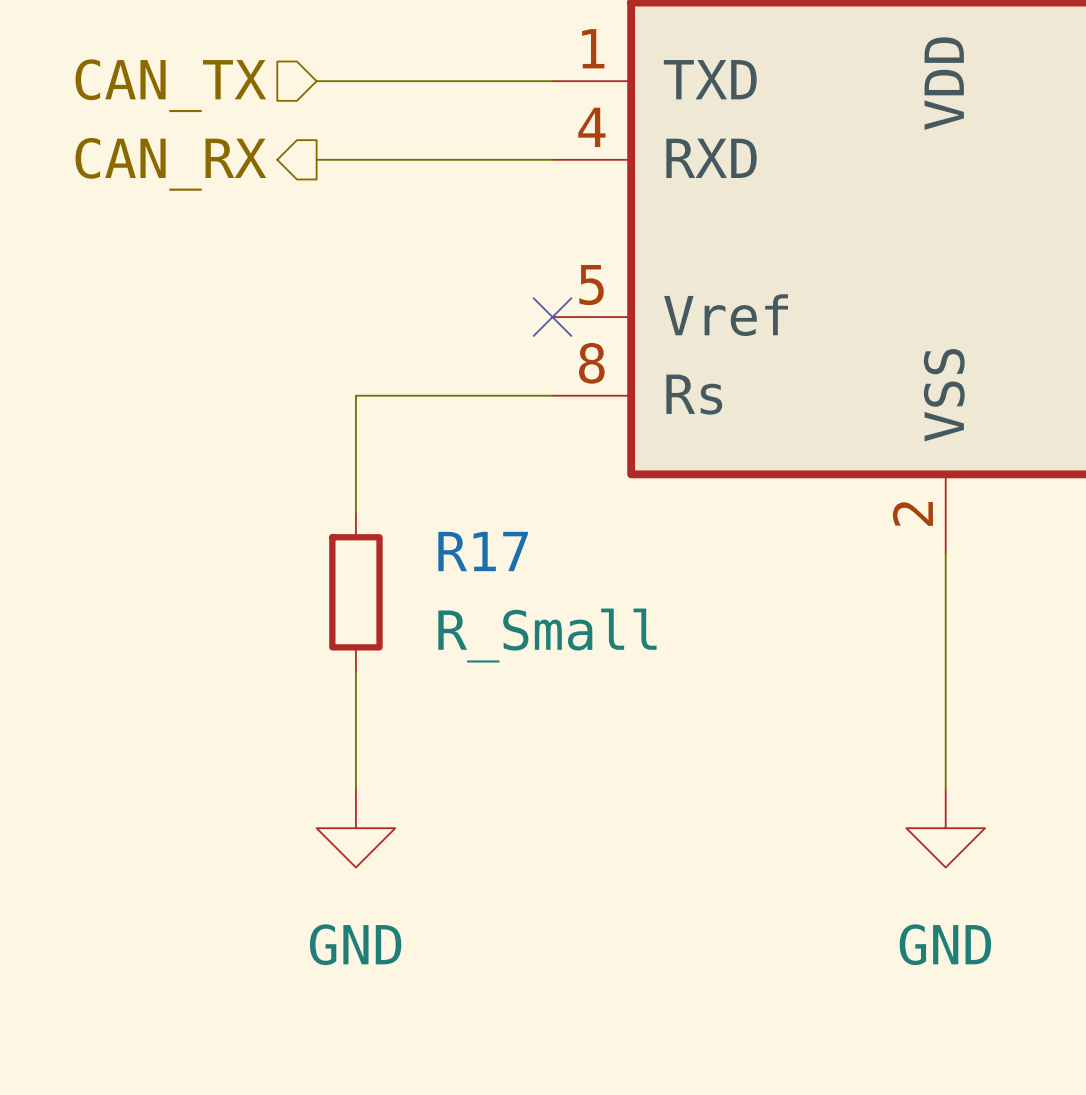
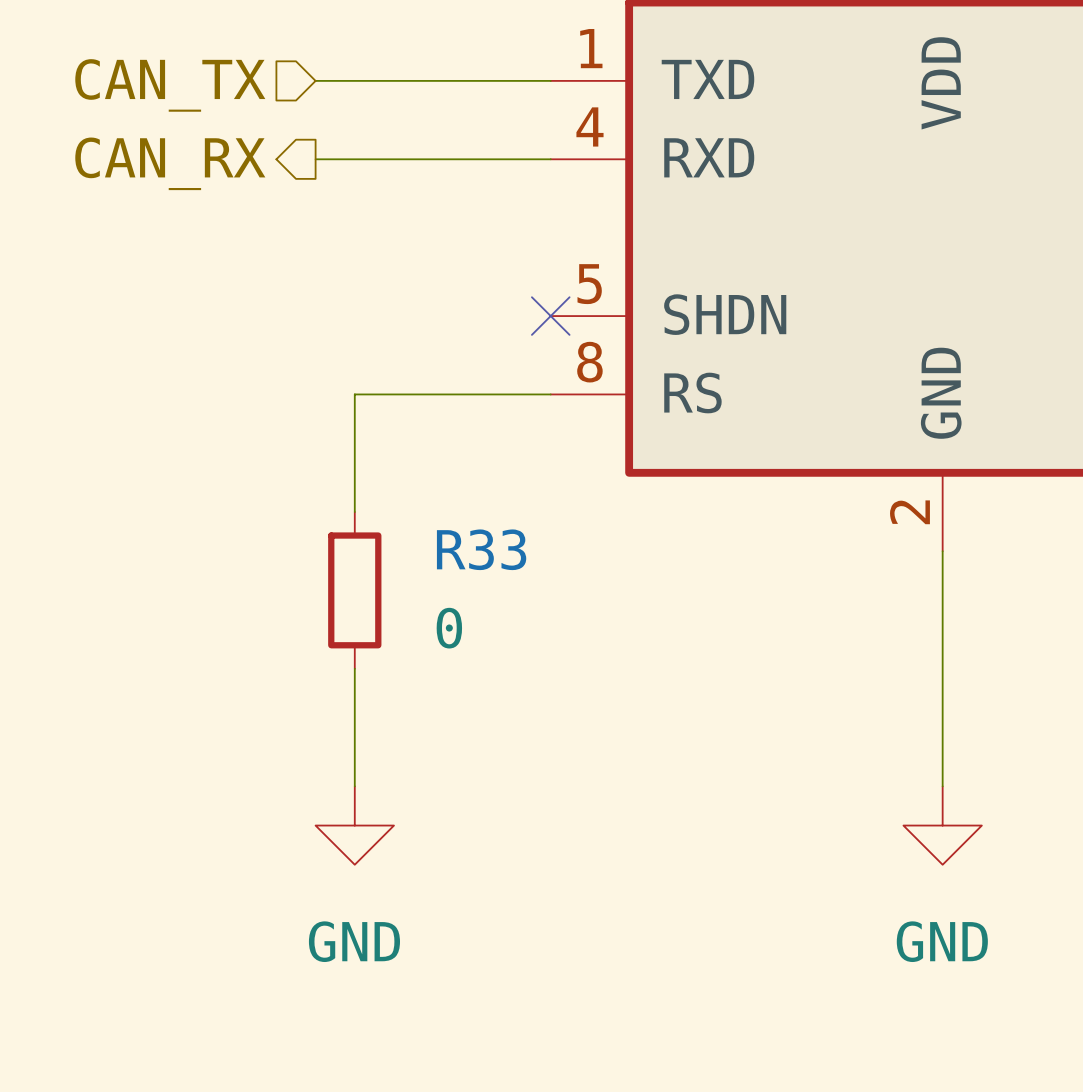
part pin name: Vref (726, 315) -> SHDN (725, 314)
part pin name: Rs (694, 394) -> RS (692, 393)
part pin name: VSS (944, 395) -> GND (941, 393)
R17 name: R17 (483, 551) -> R33 (481, 549)
R17 value: R_Small (547, 635) -> 0 (449, 628)

